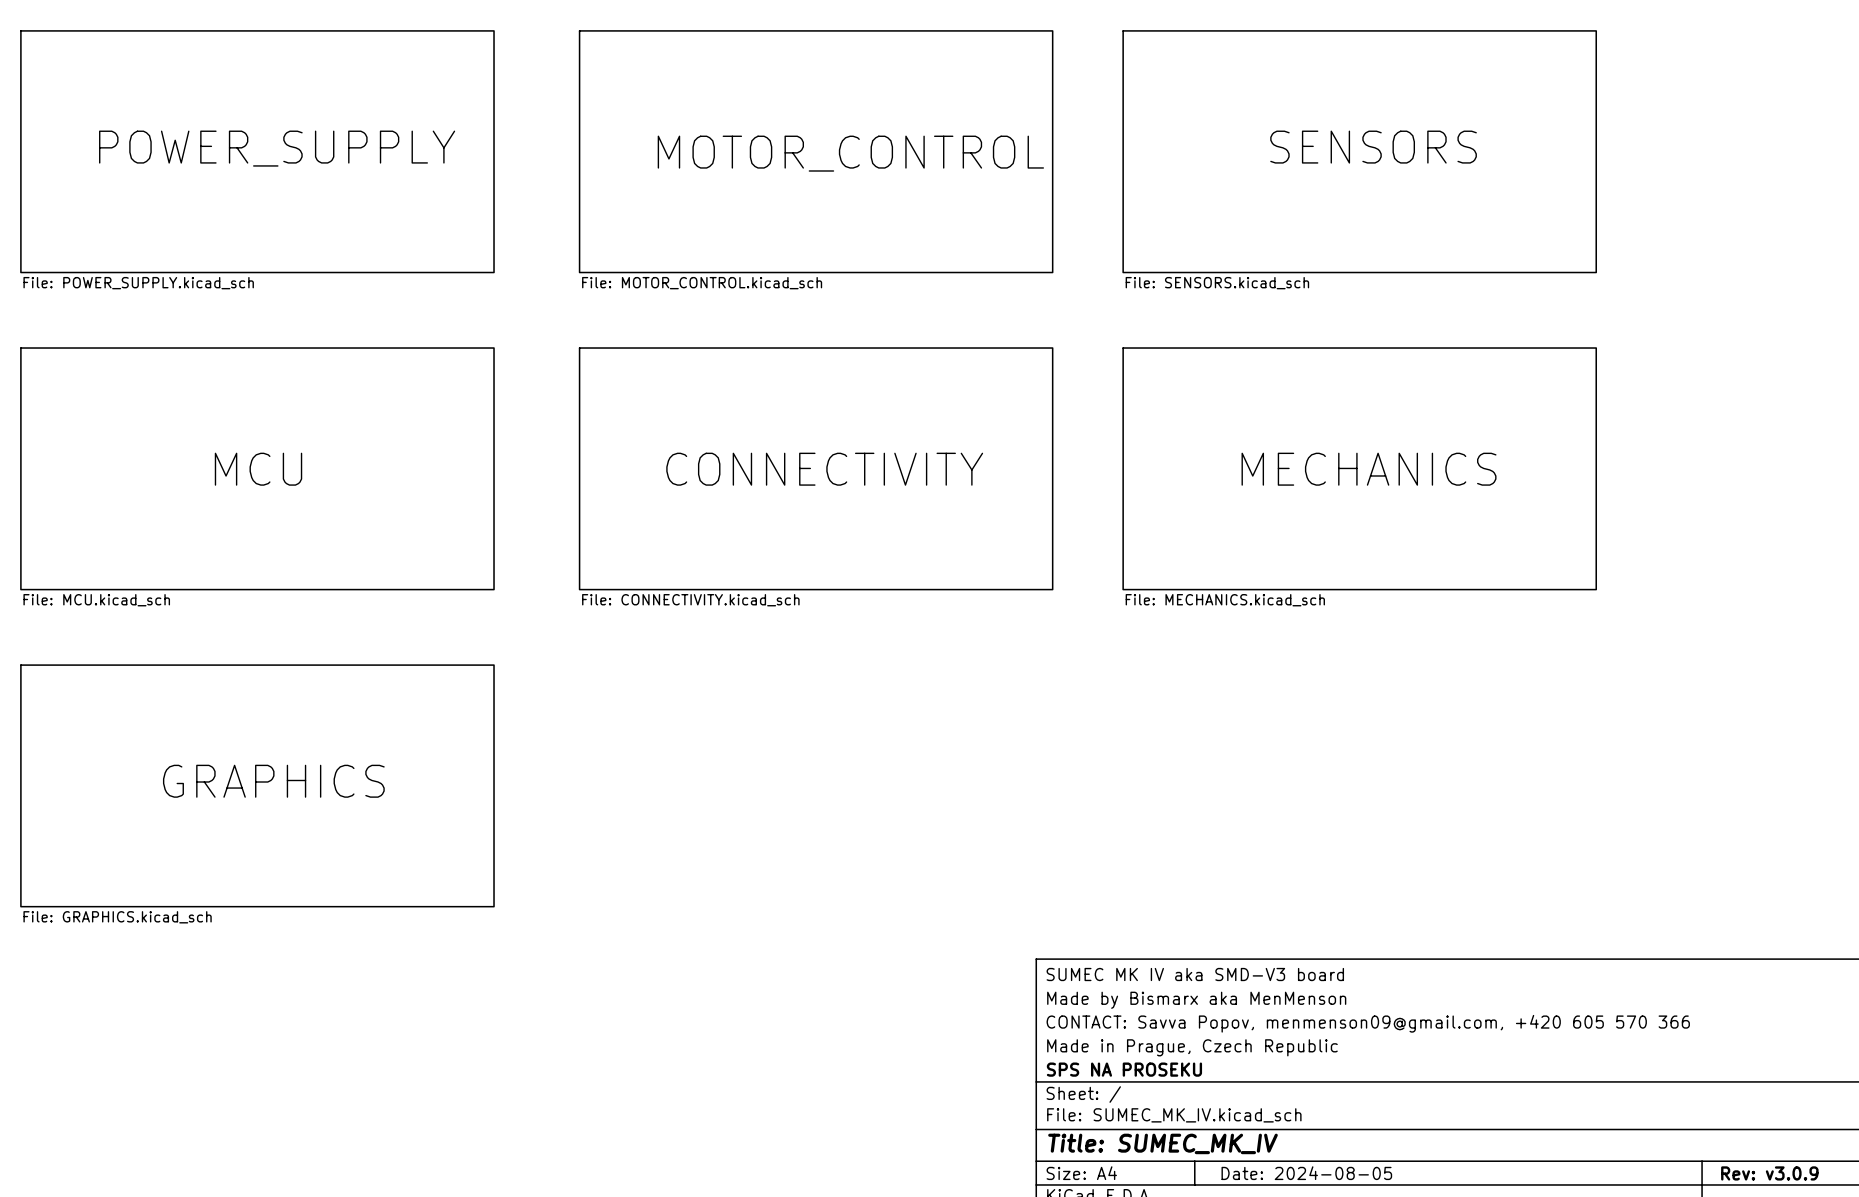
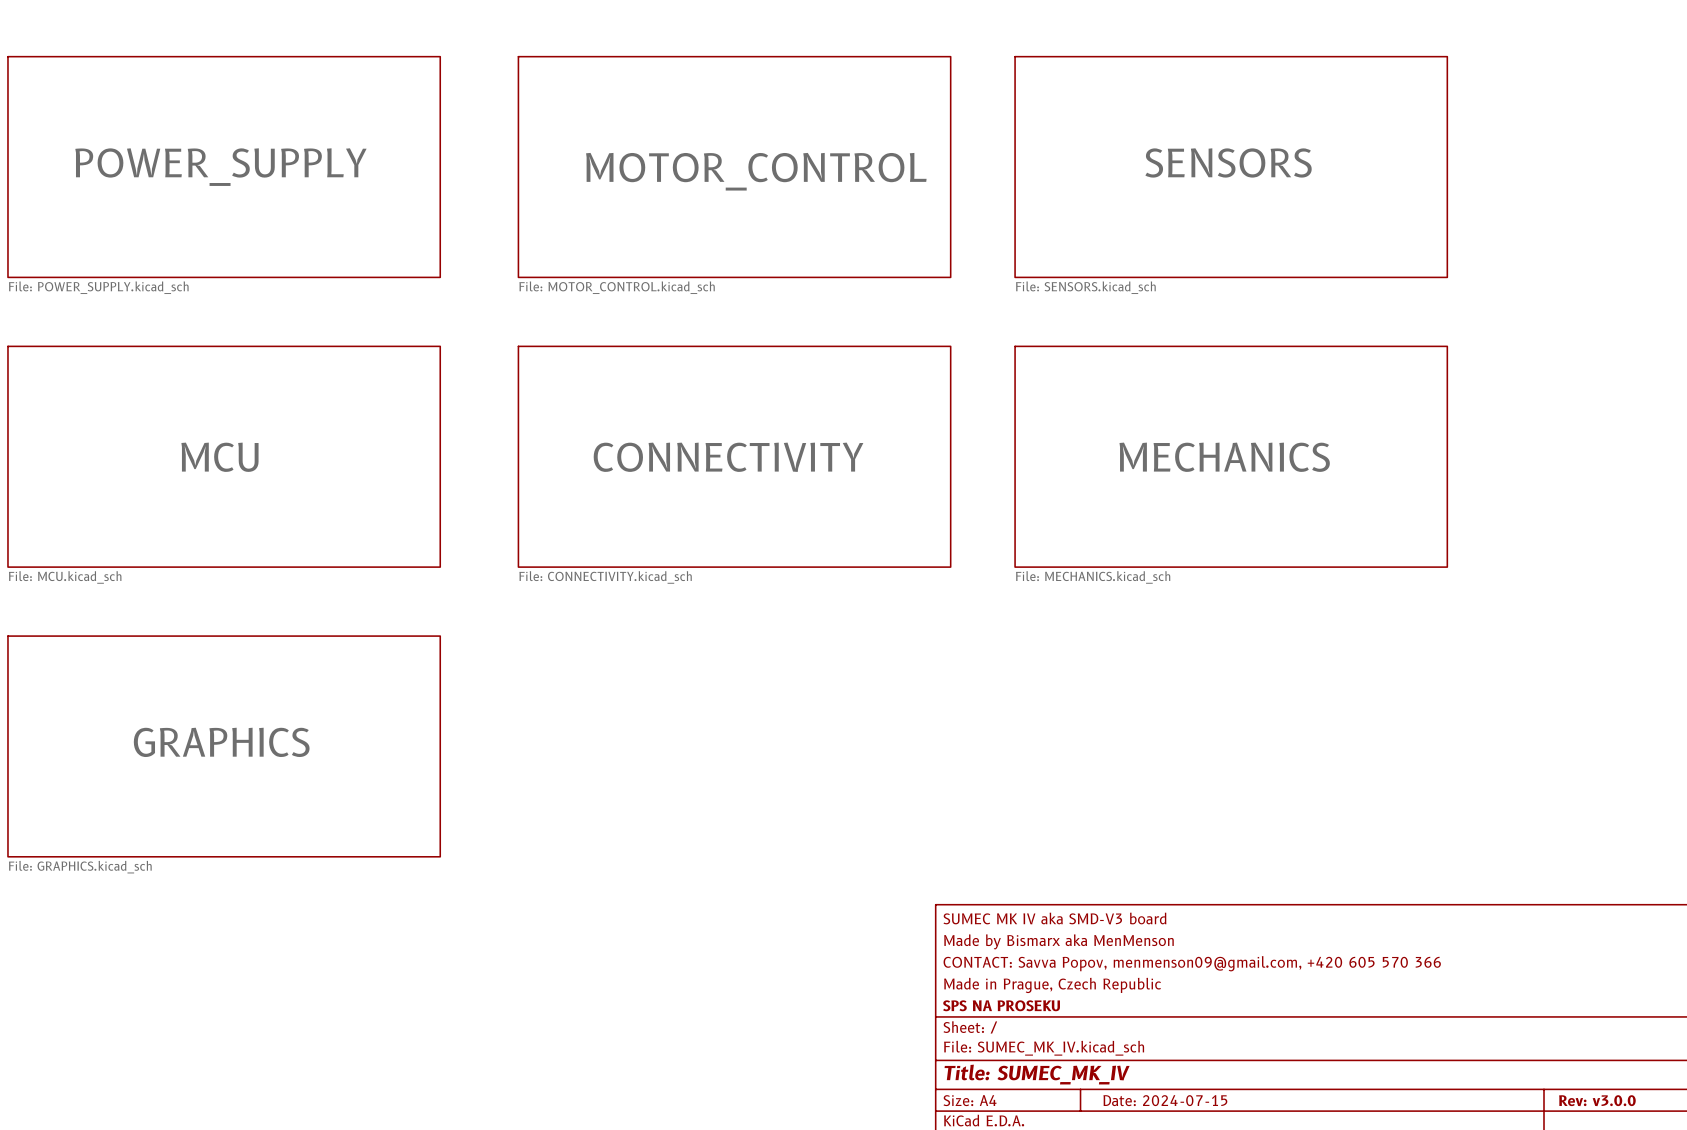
title block: Date: 2024-08-05 (1306, 1173) -> Date: 2024-07-15 (1165, 1100)
title block: Rev: v3.0.9 (1769, 1173) -> Rev: v3.0.0 (1597, 1100)

